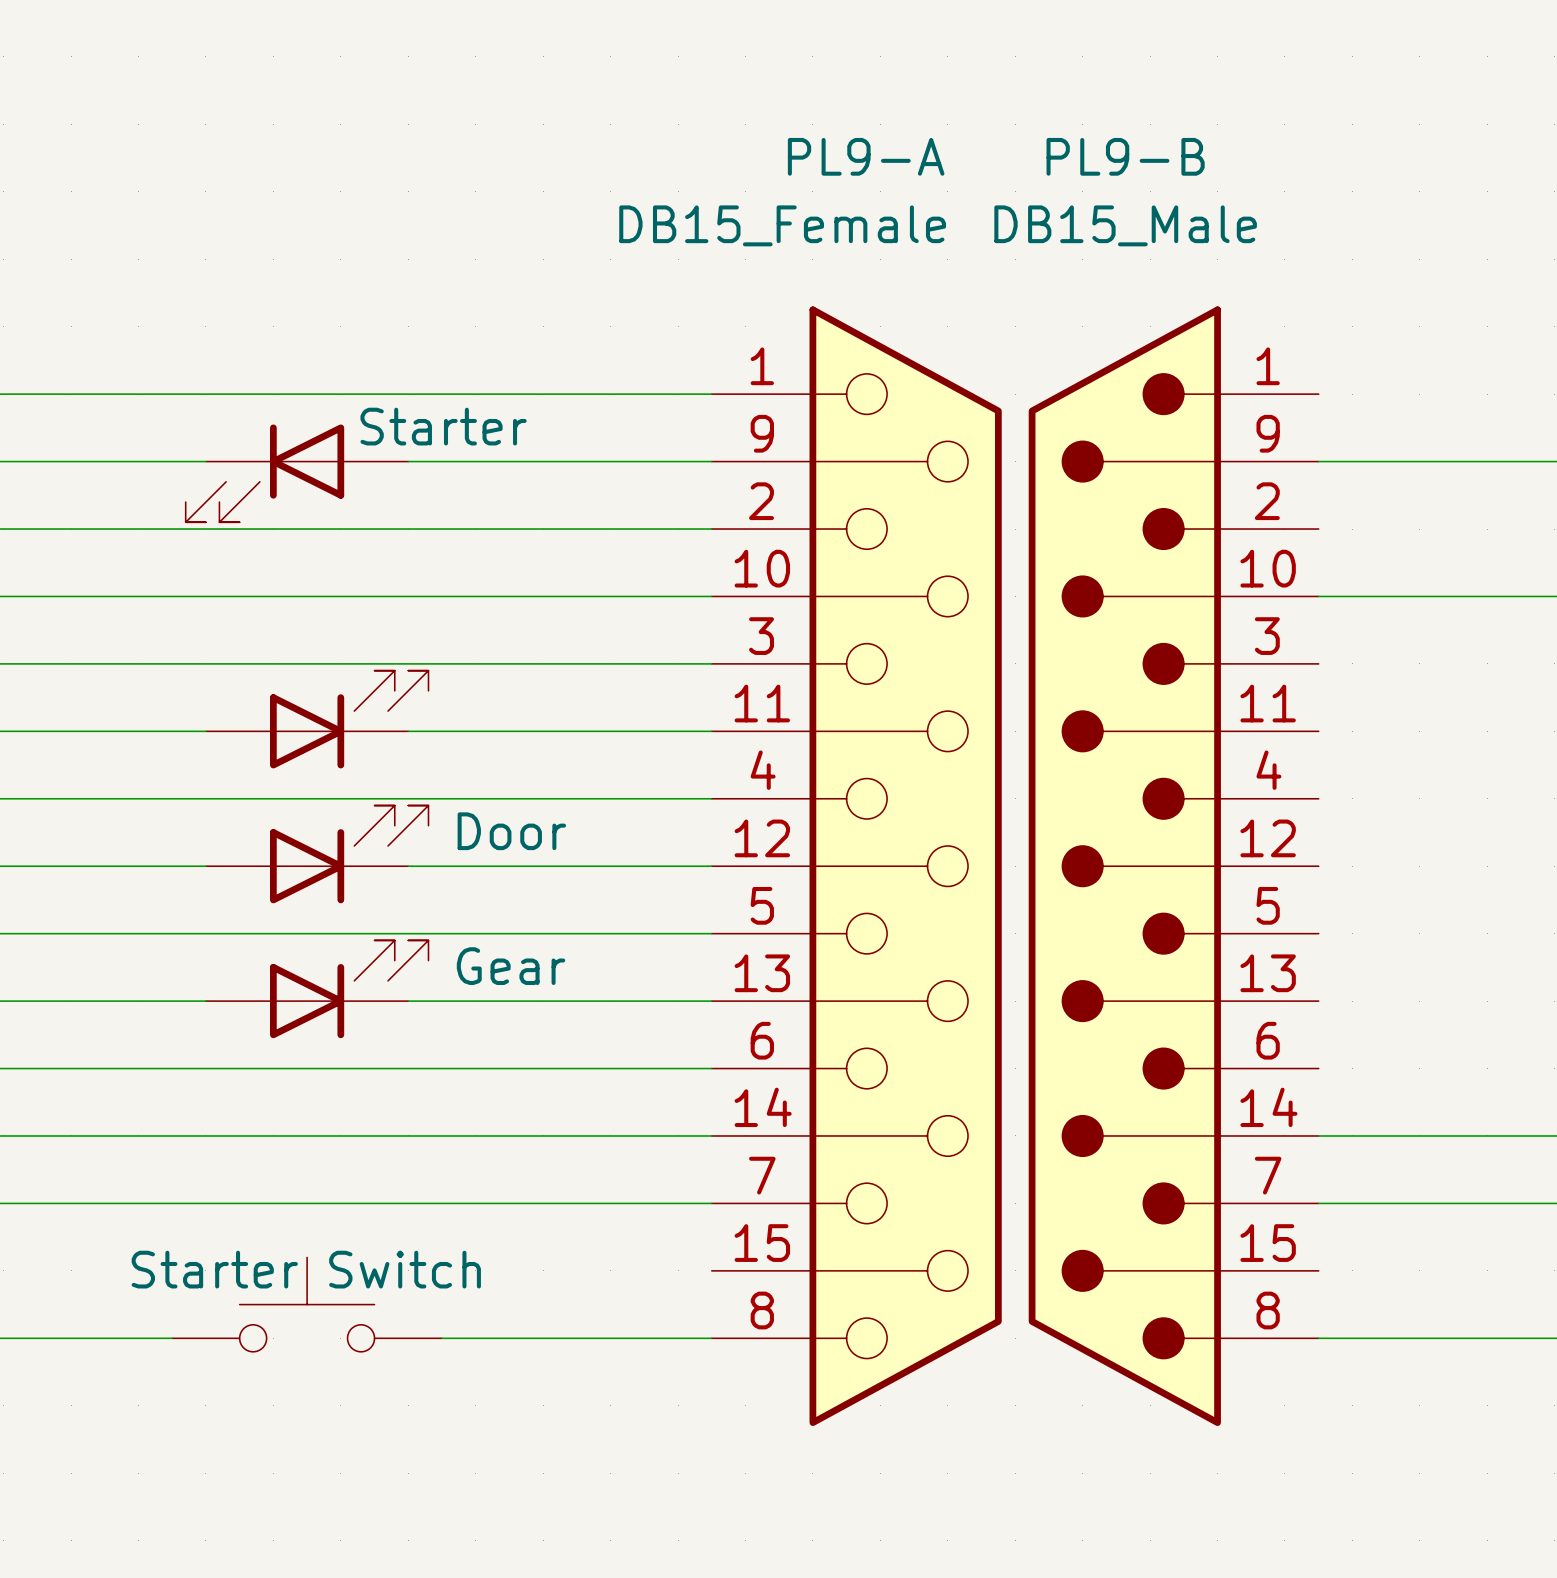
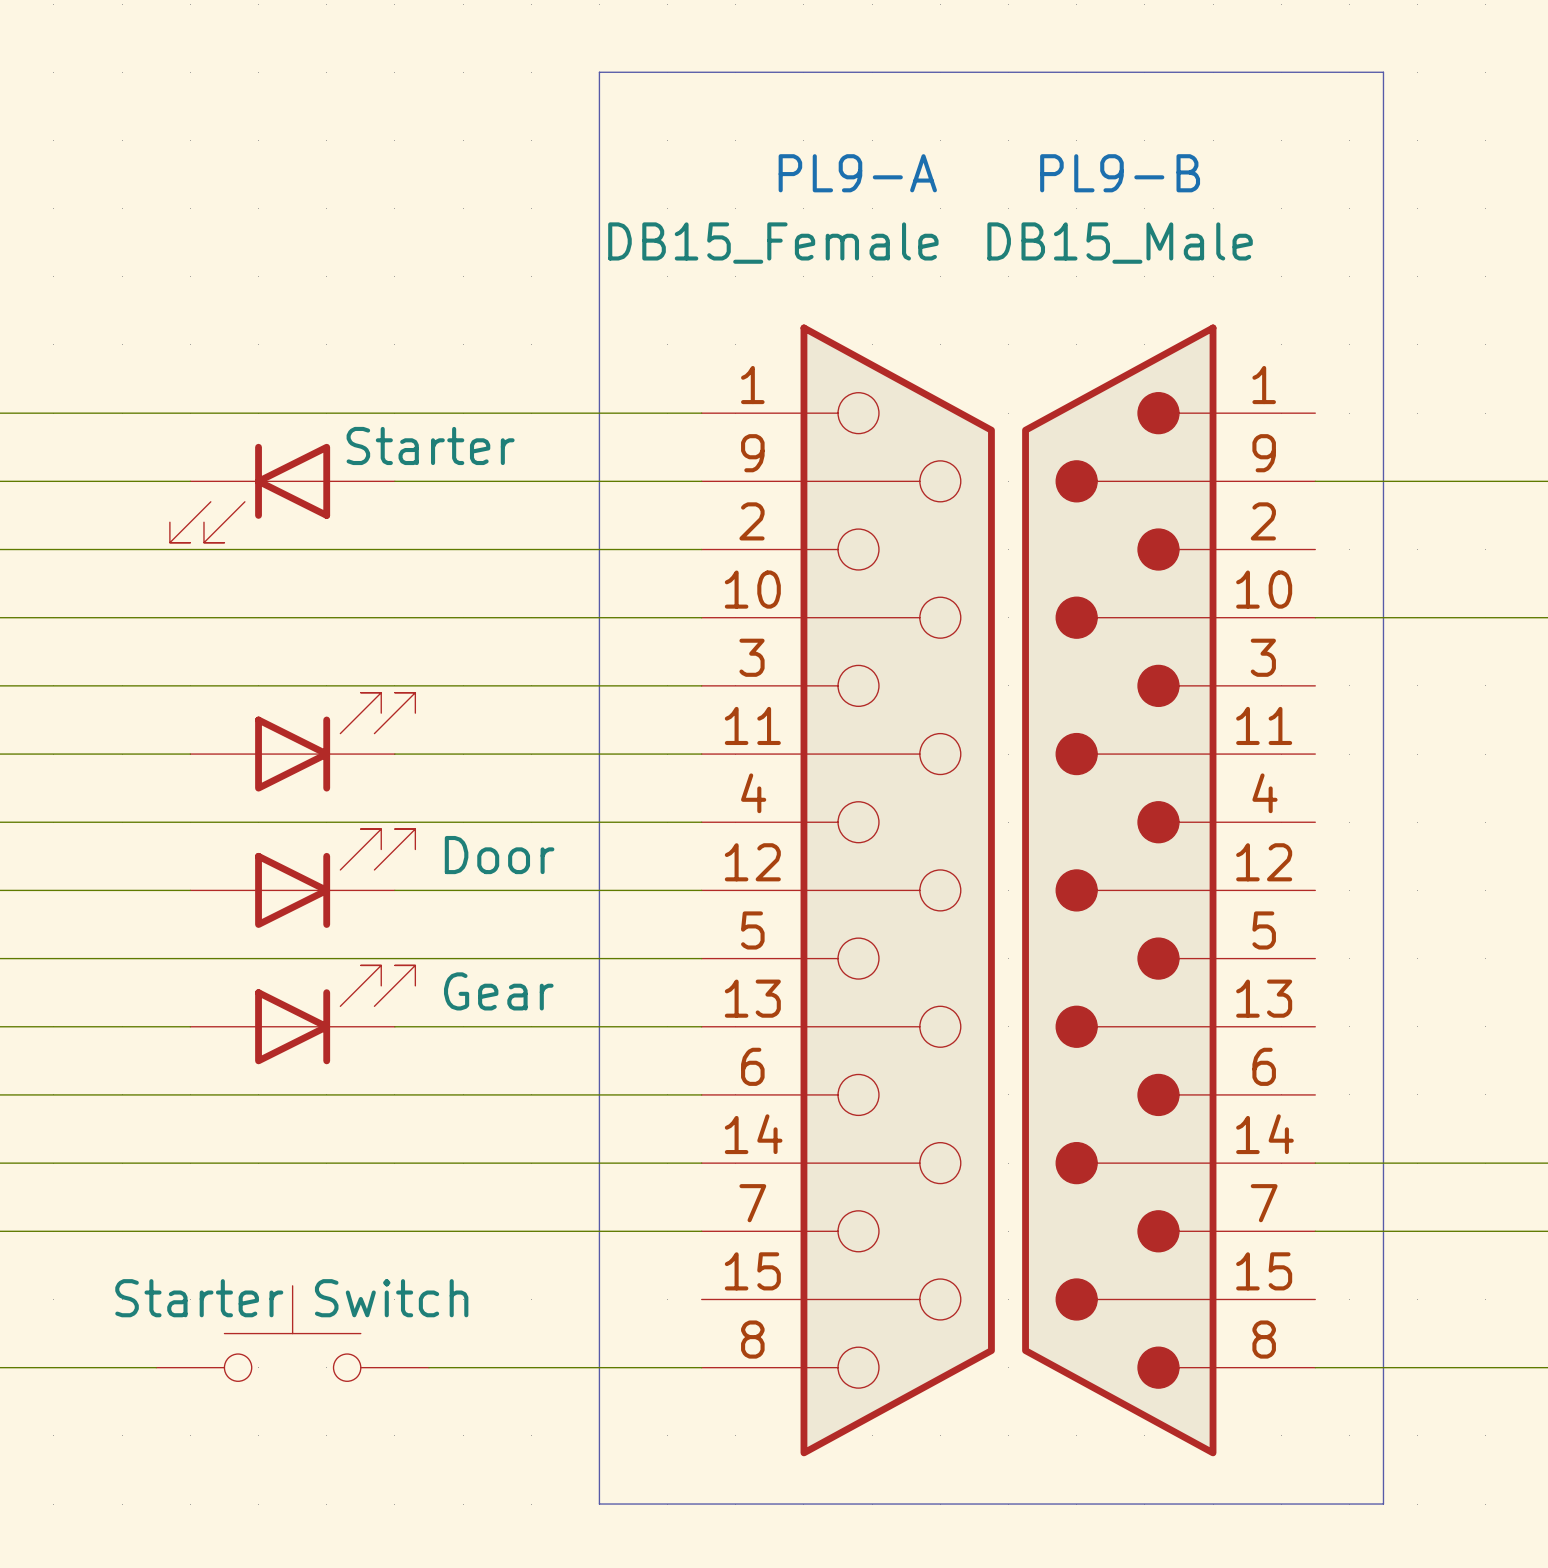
line: none -> (599, 72) (599, 1504) (1383, 1504) (1383, 72) (599, 72)

